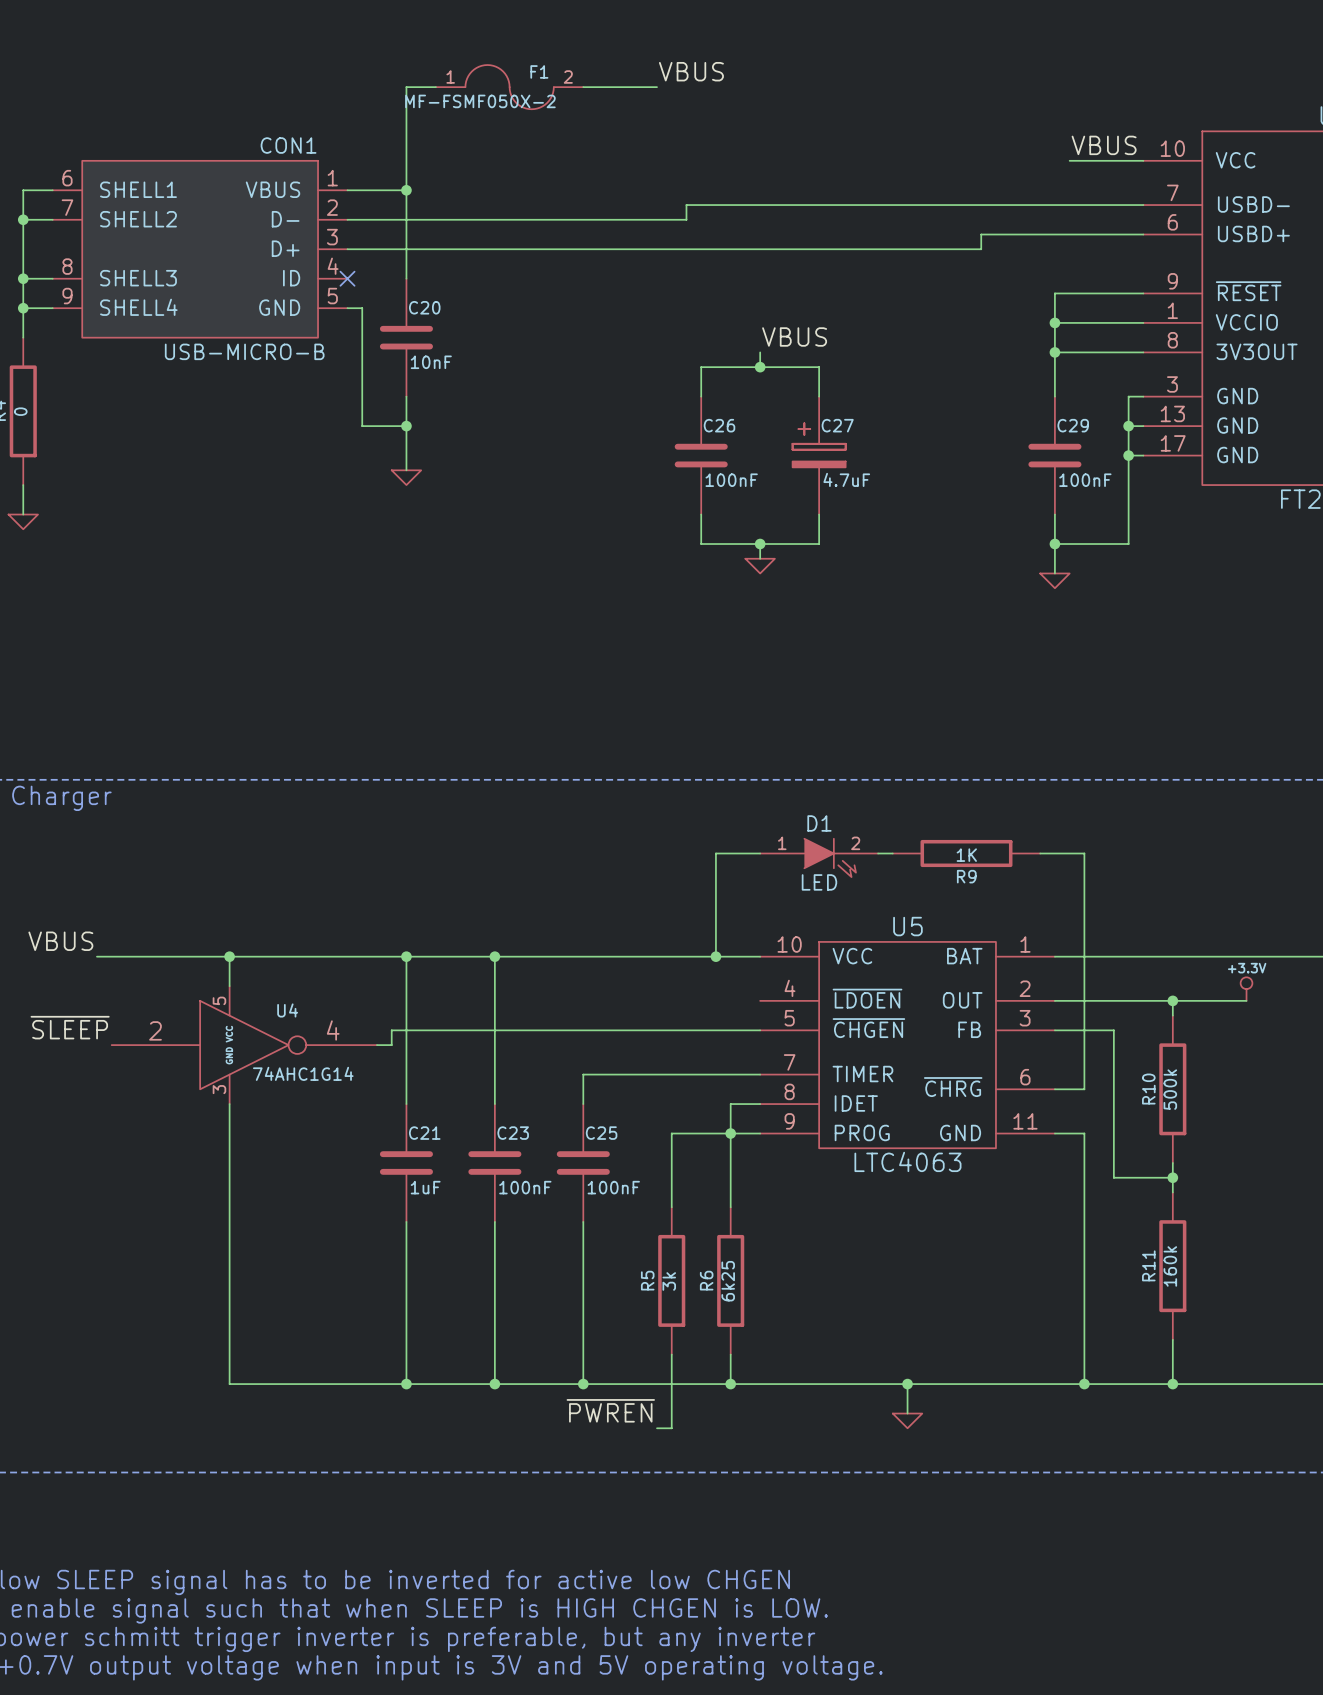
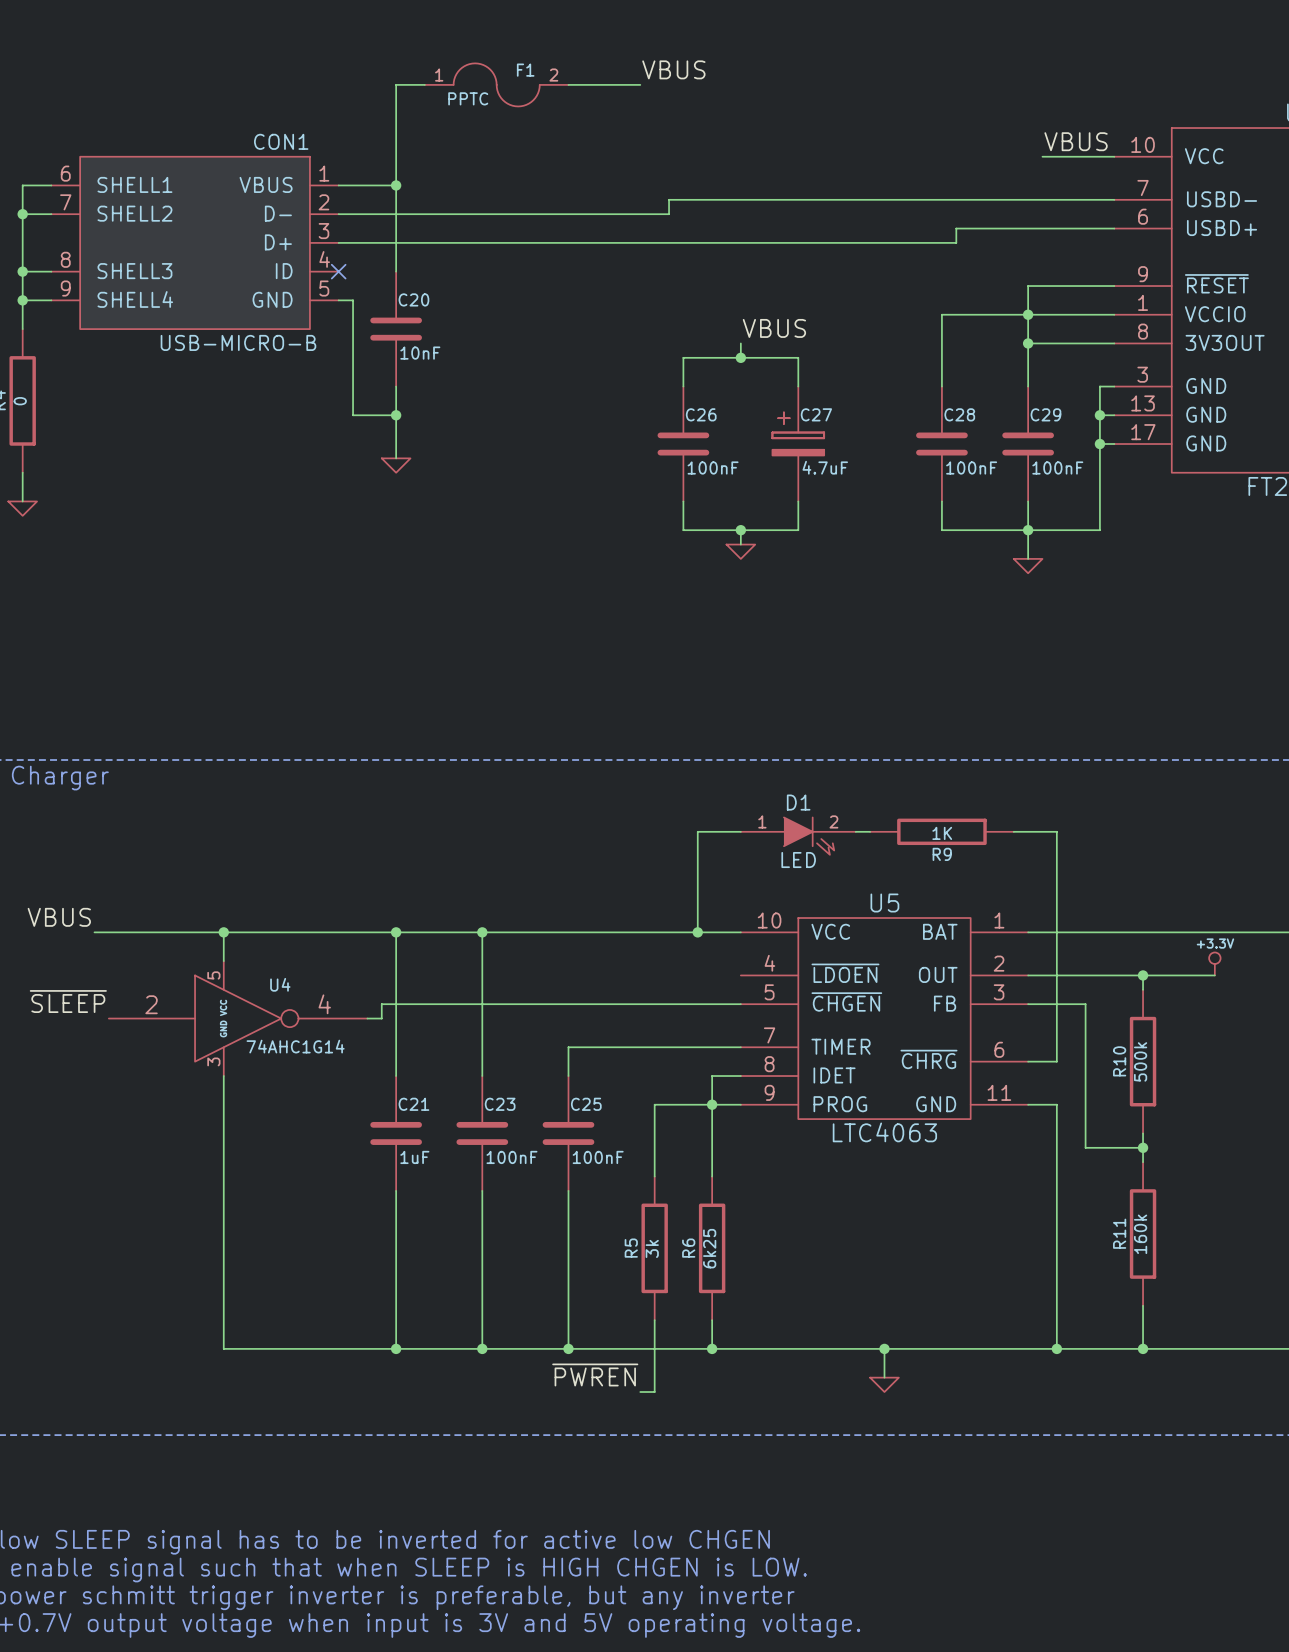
F1 value: MF-FSMF050X-2 (480, 101) -> PPTC (468, 98)
wire: none -> (1028, 314) (941, 314) (941, 386)
C28: none -> 100nF (941, 444)
wire: none -> (941, 501) (941, 530) (1028, 530)

